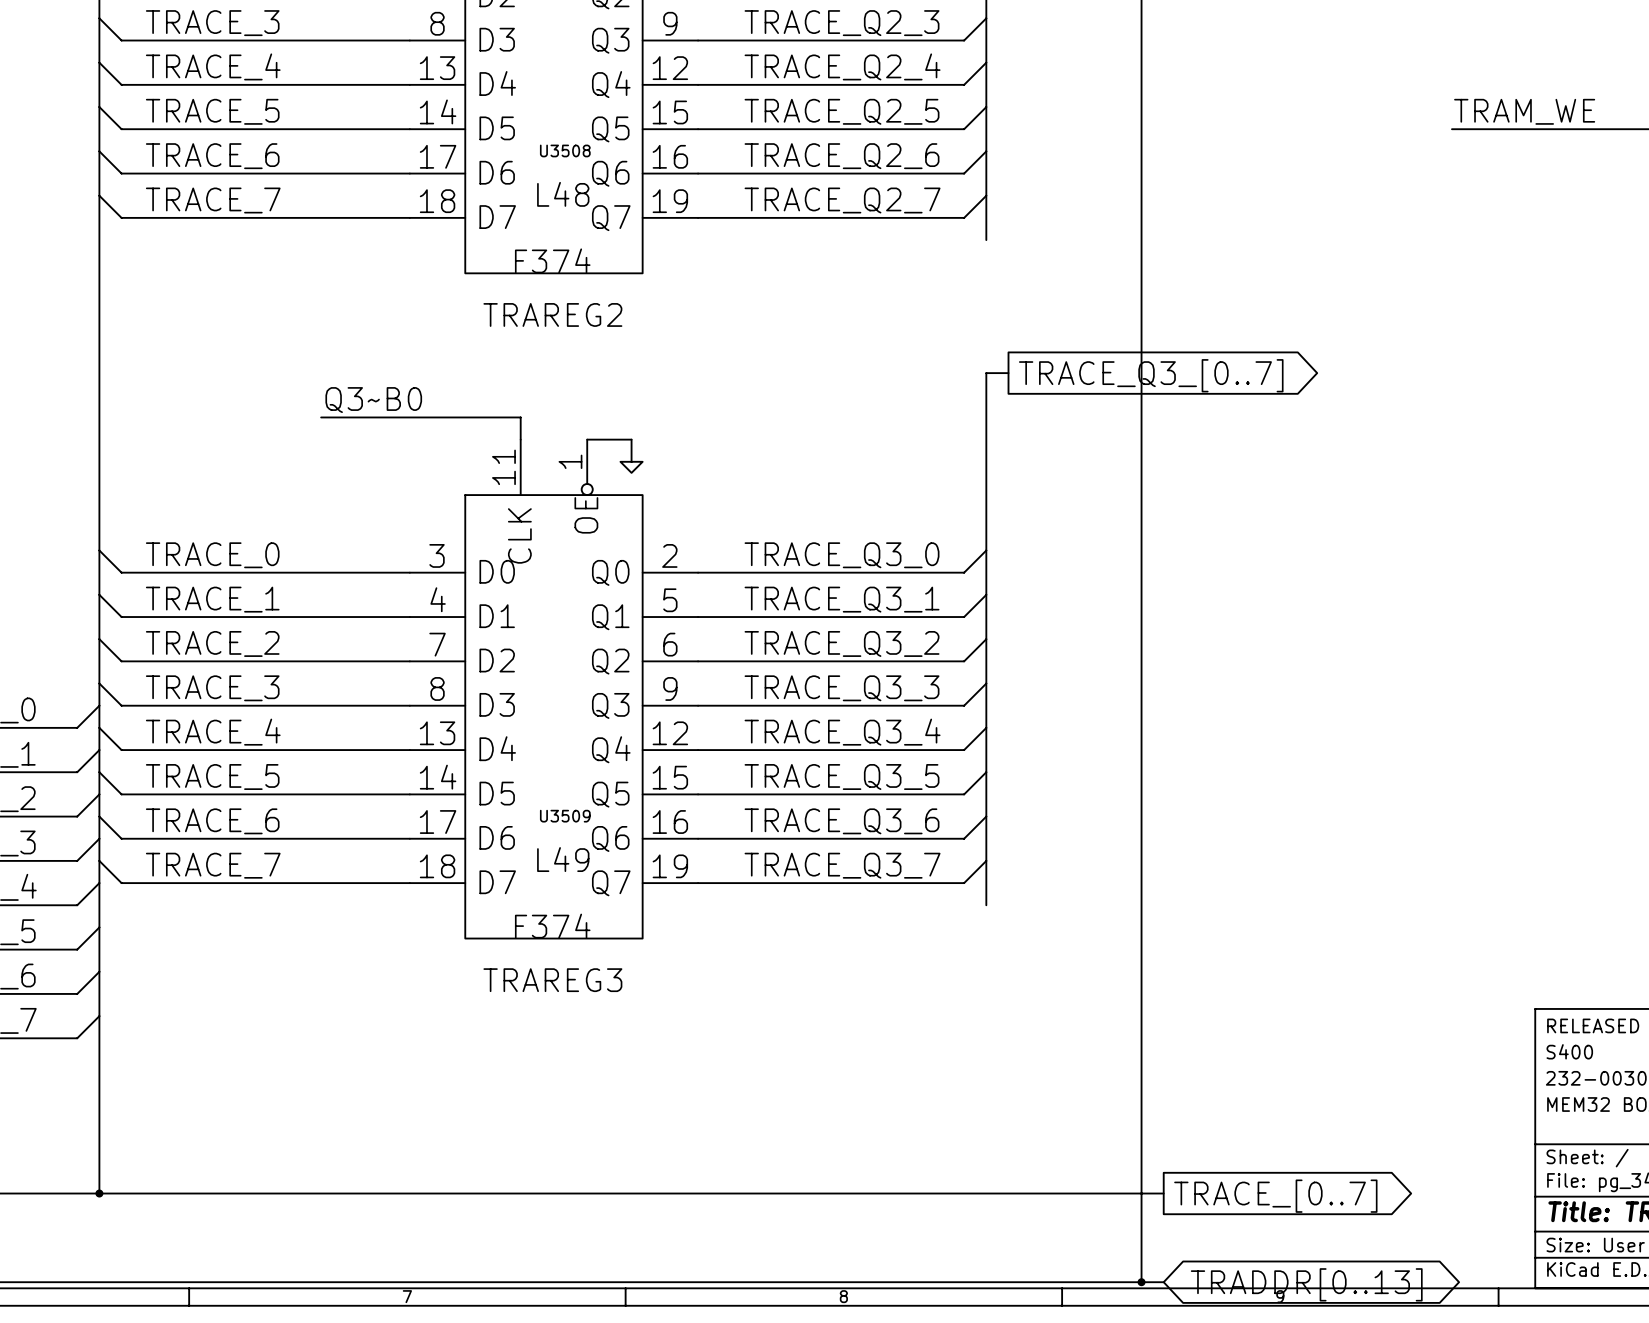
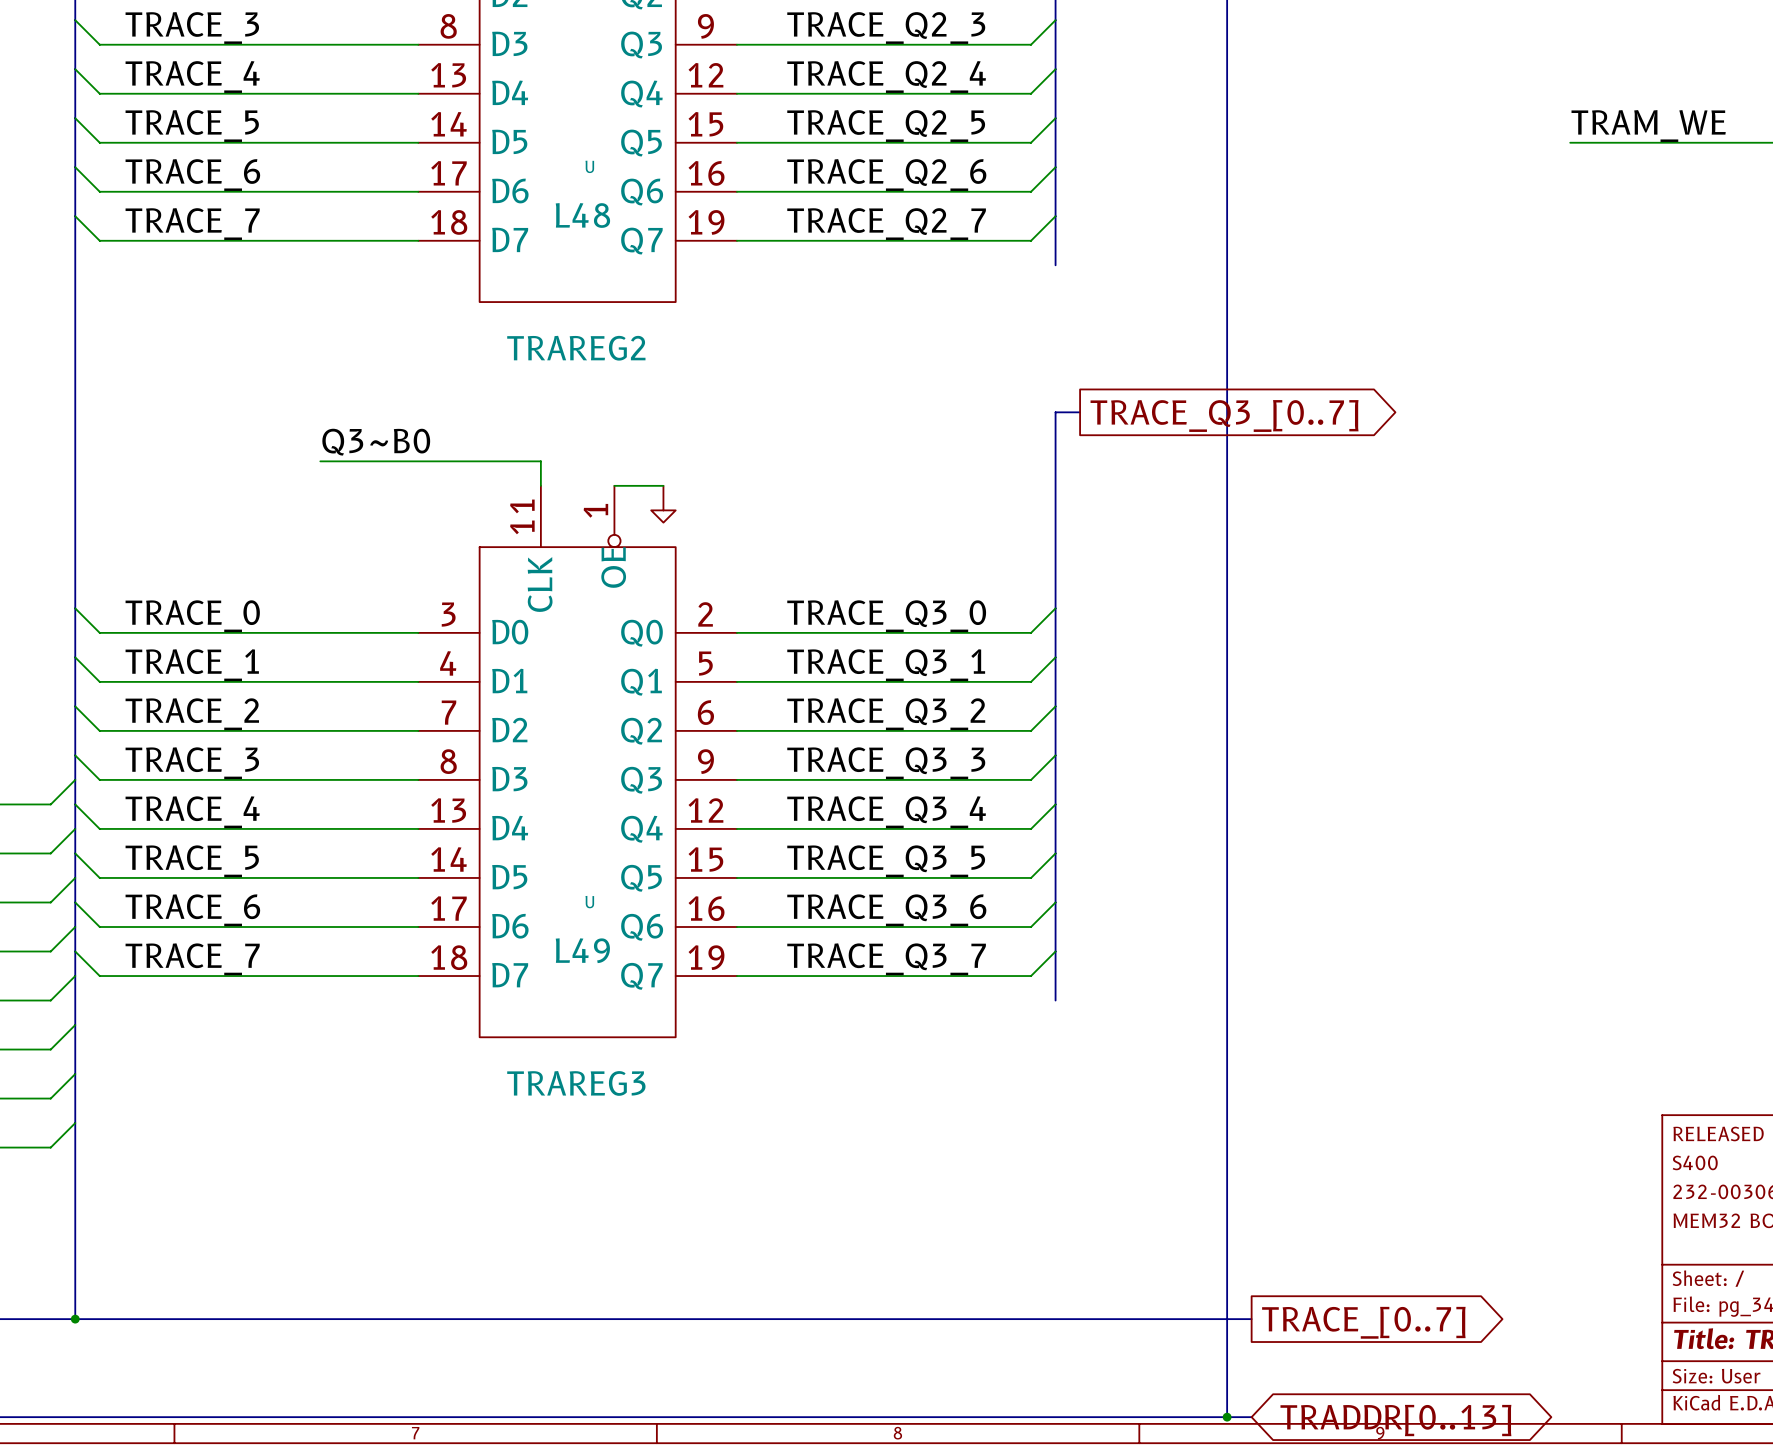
U3508 name: U3508 (565, 150) -> U (589, 166)
U3508 value: F374 (552, 260) -> none
U3509 name: U3509 (565, 816) -> U (589, 902)
U3509 value: F374 (552, 926) -> none

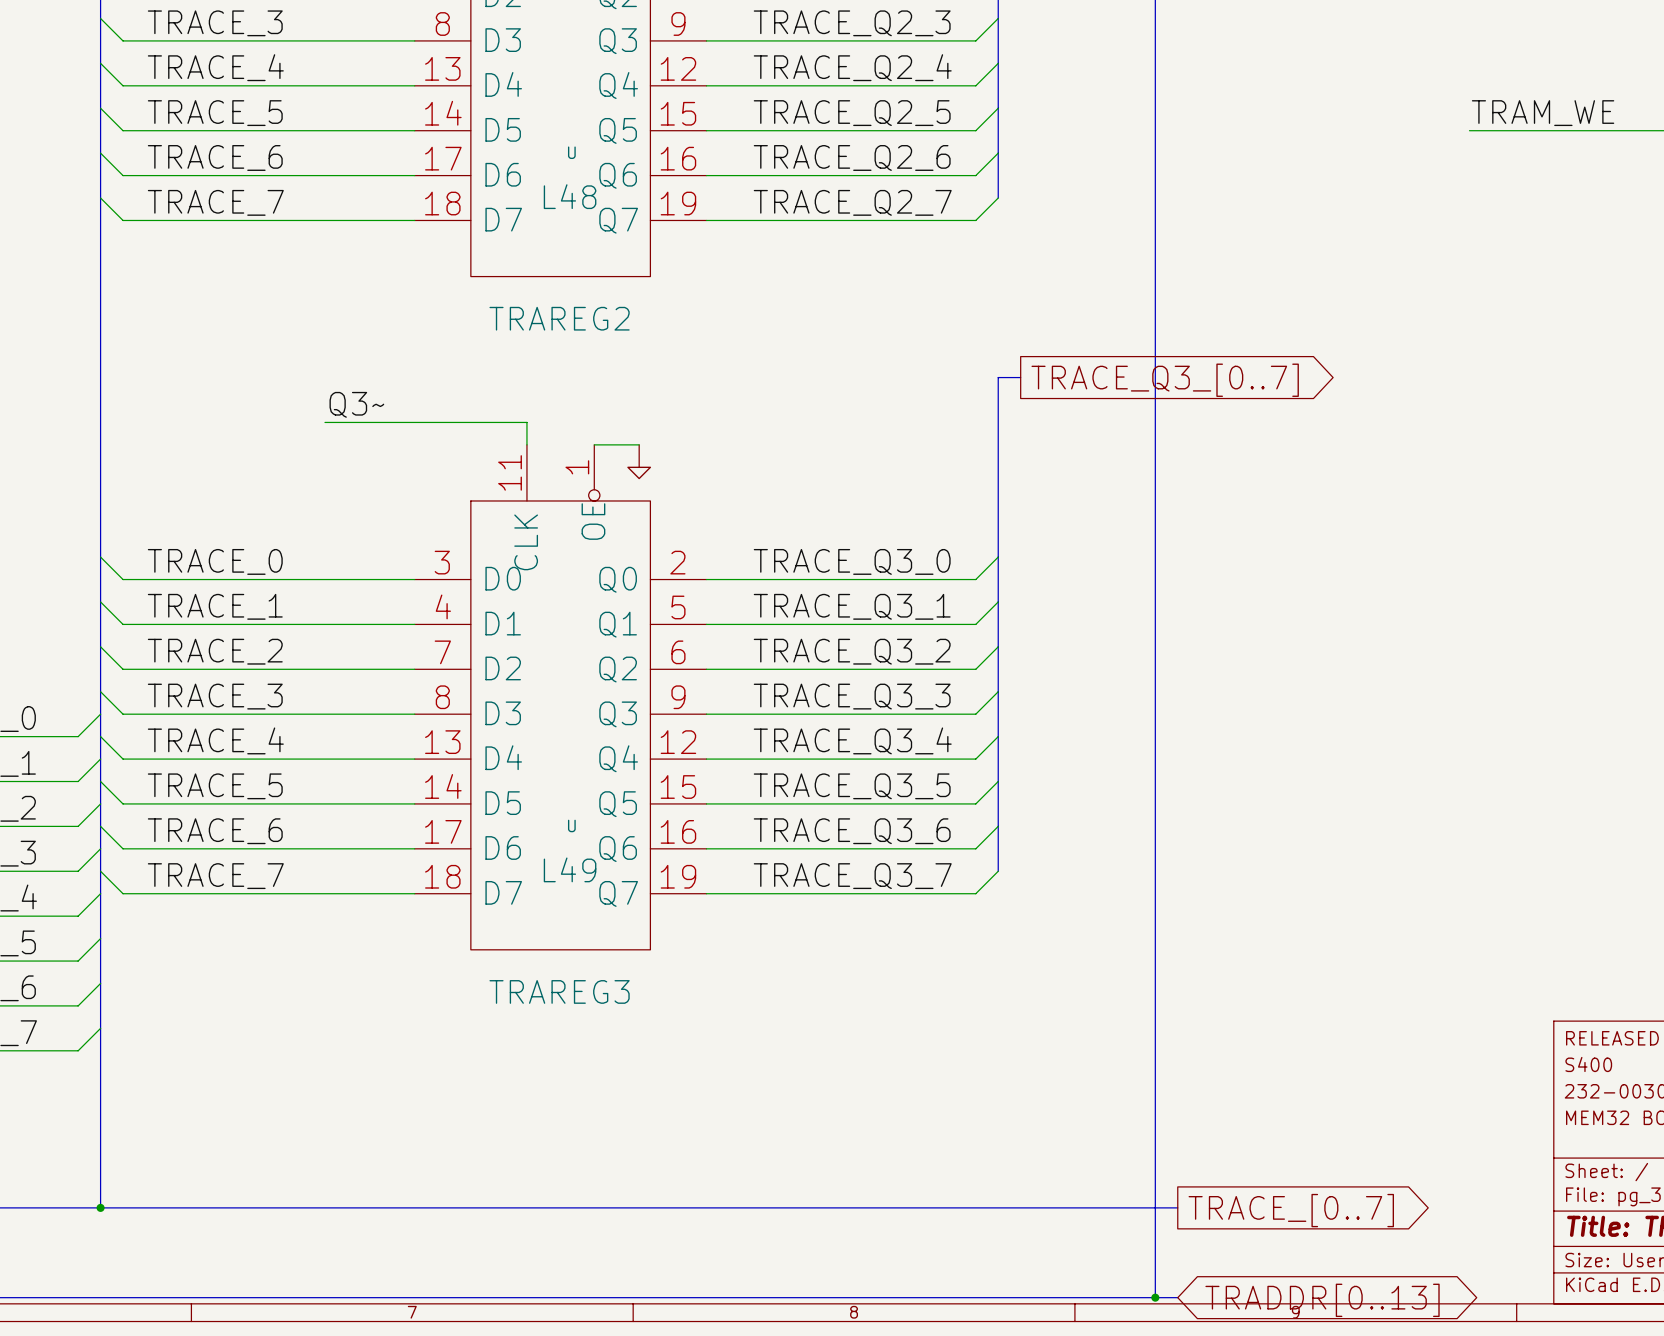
bus: (1055, 216) (1055, 265) -> none
label: Q3~B0 (376, 442) -> Q3~ (356, 404)
bus: (1055, 951) (1055, 1000) -> none

